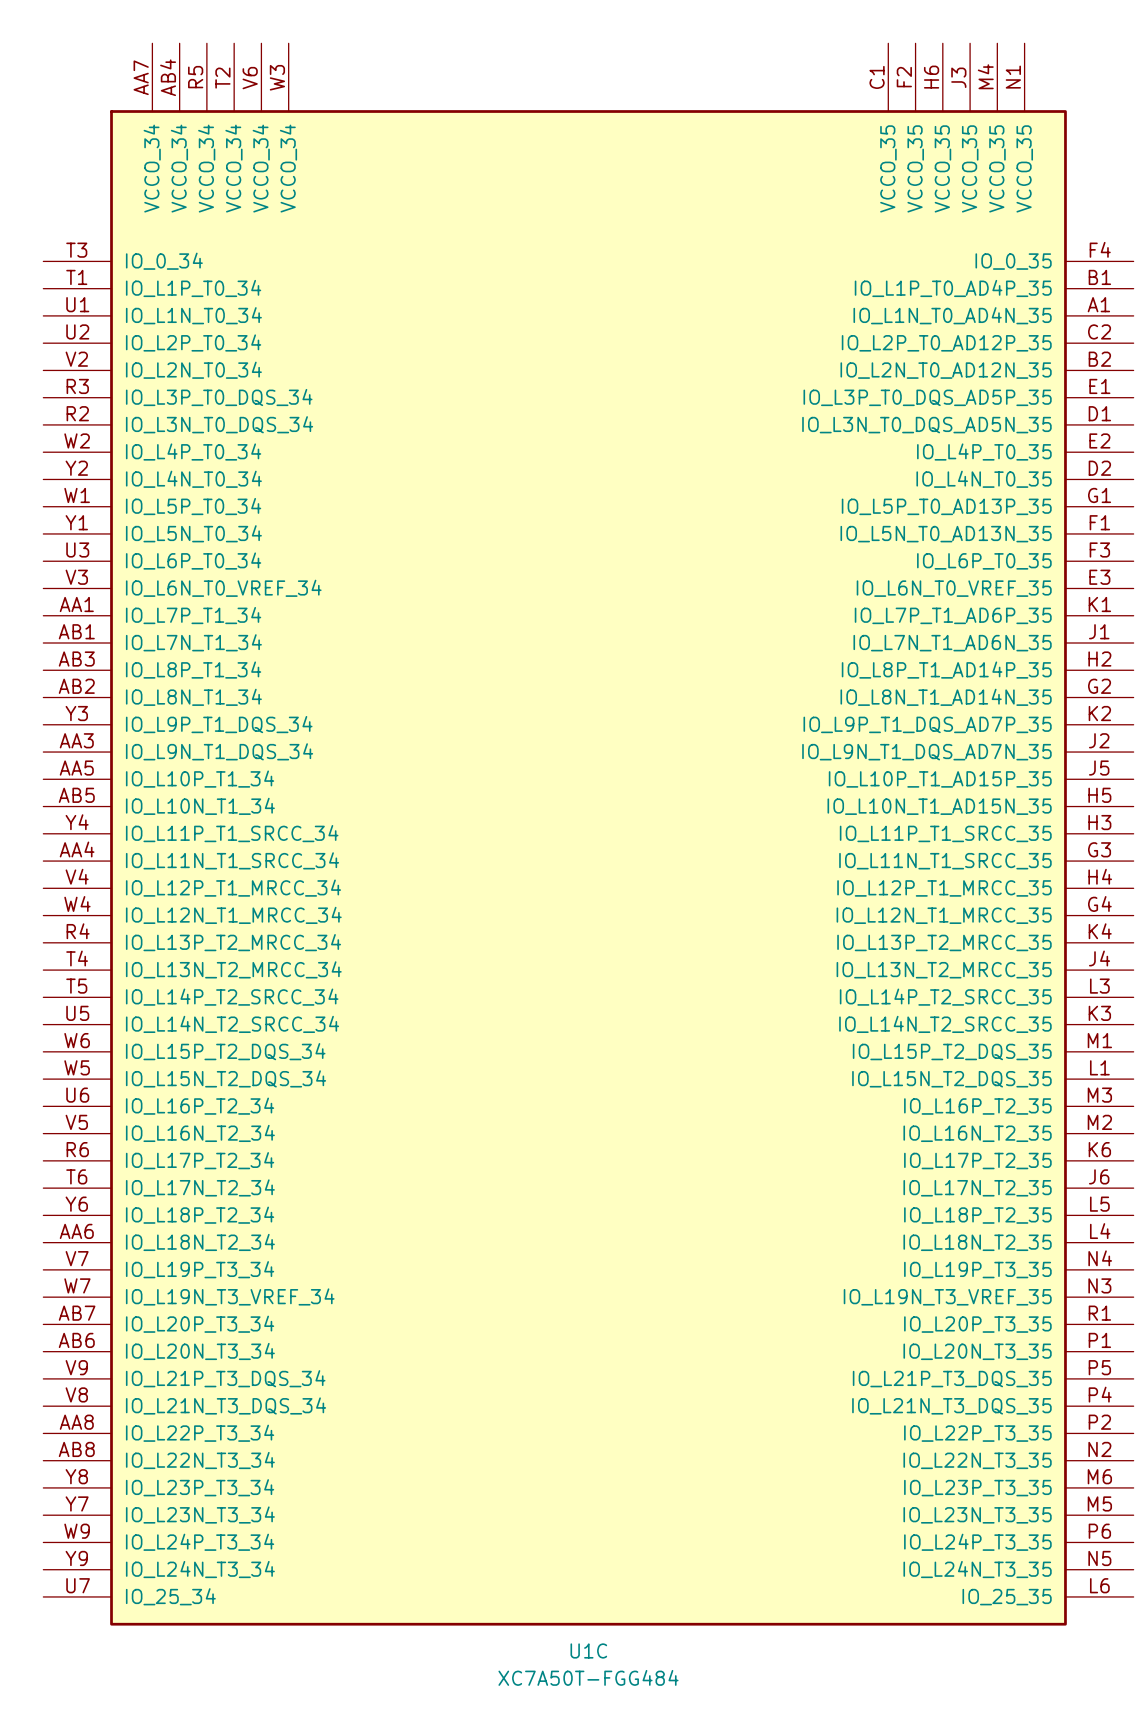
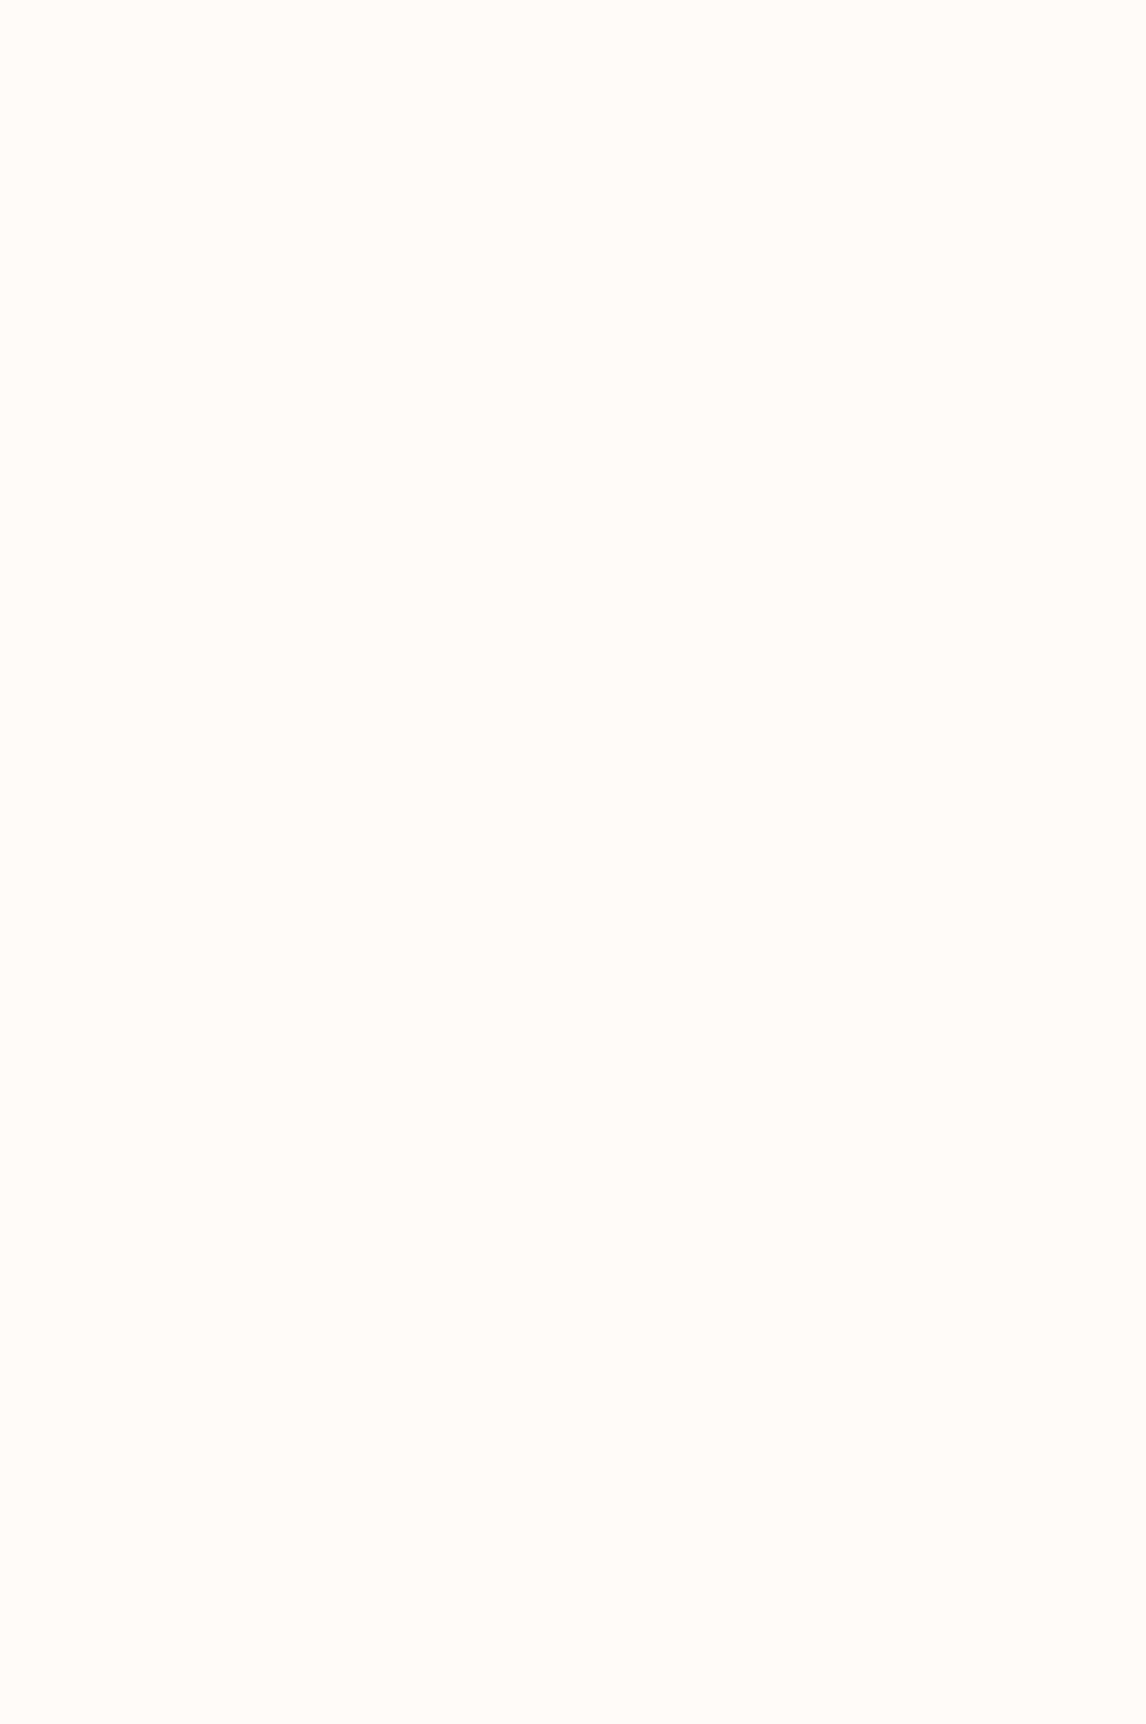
U1C: XC7A50T-FGG484 (588, 834) -> none

